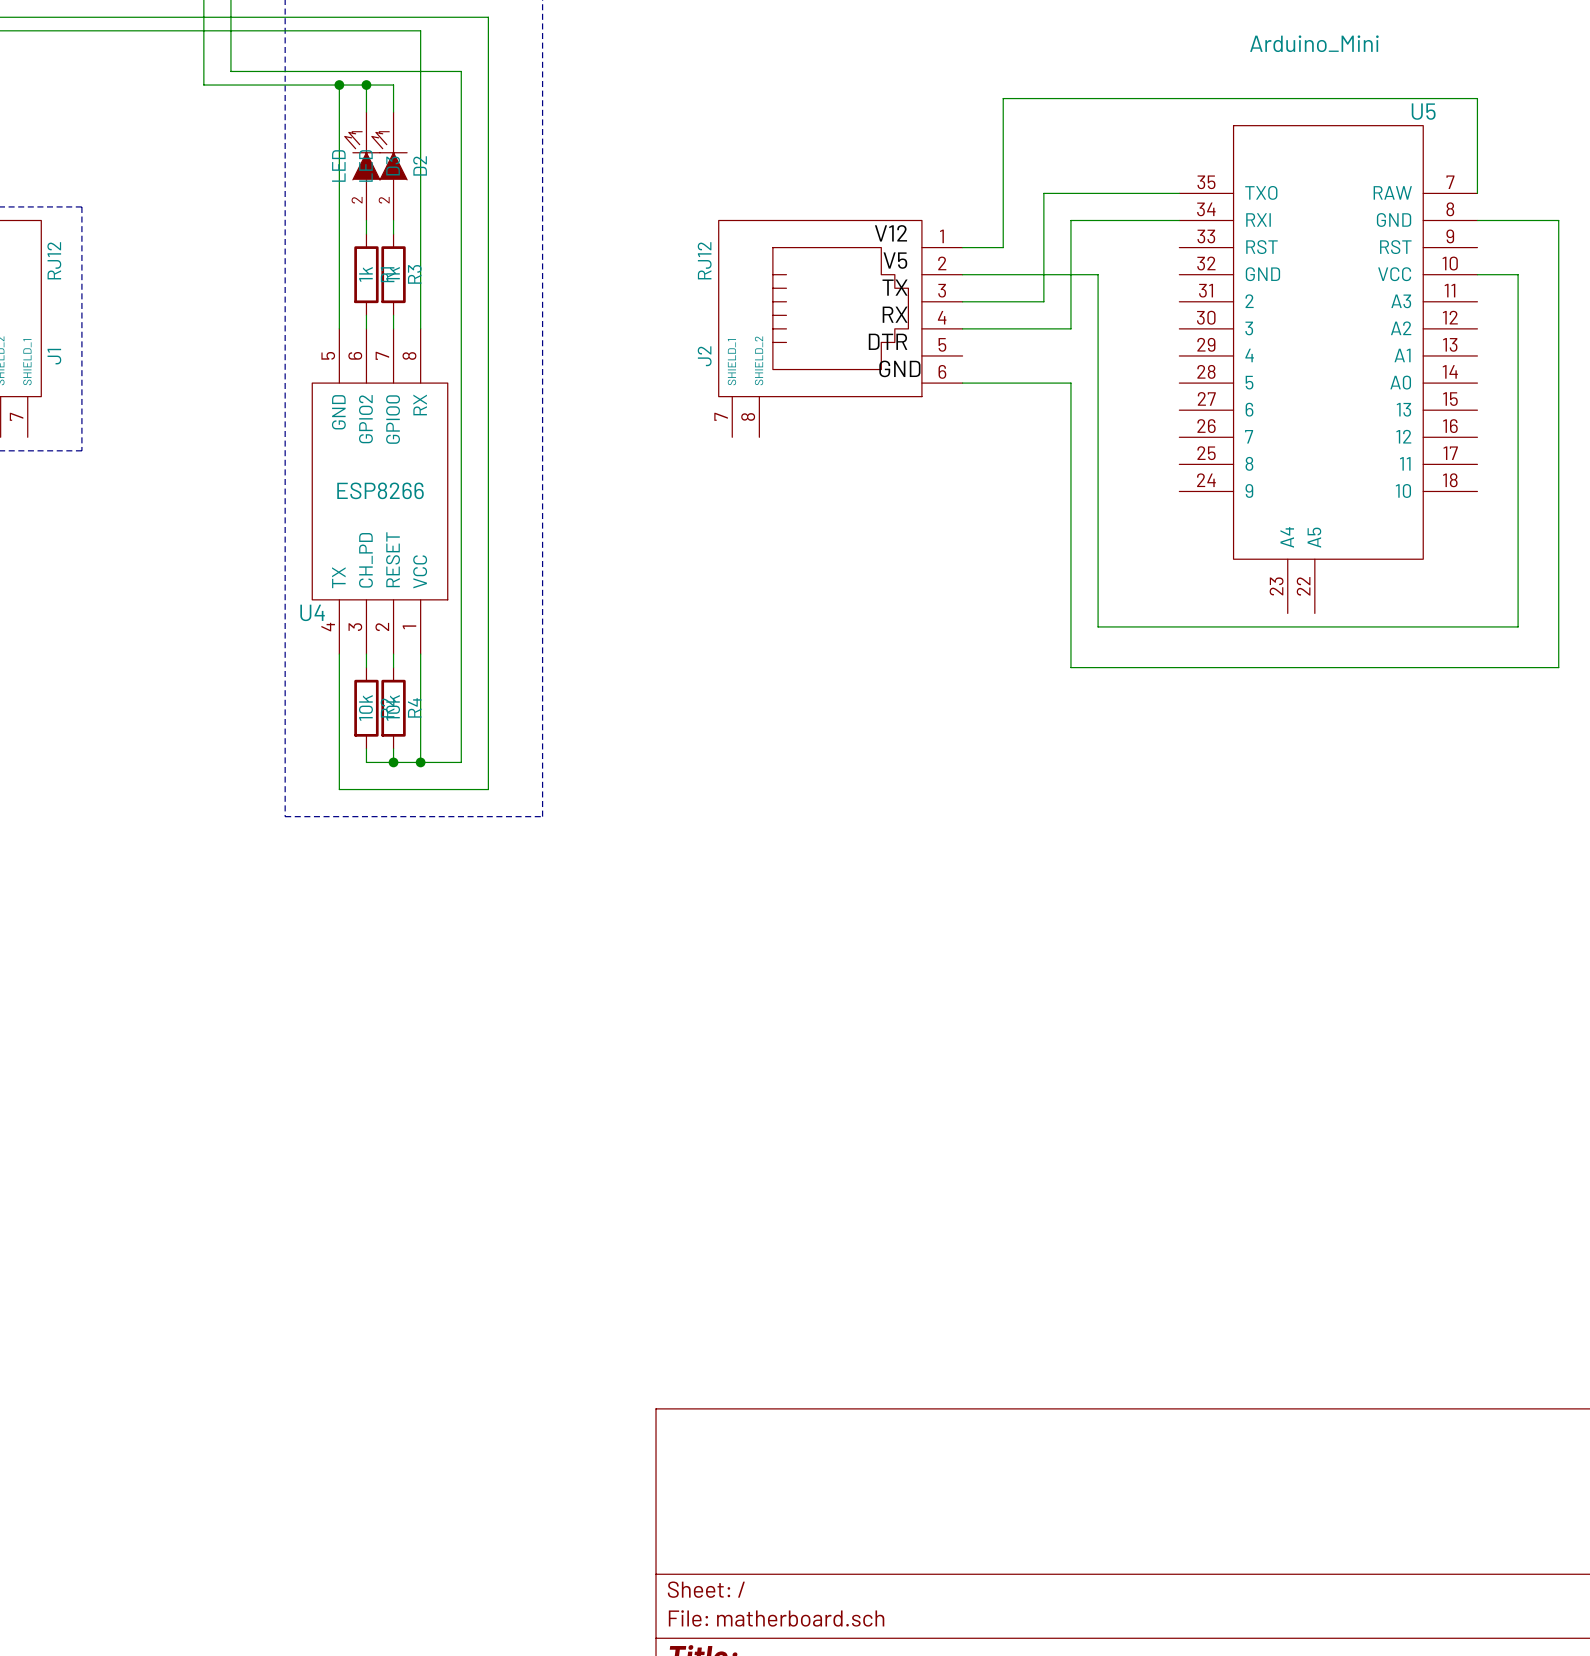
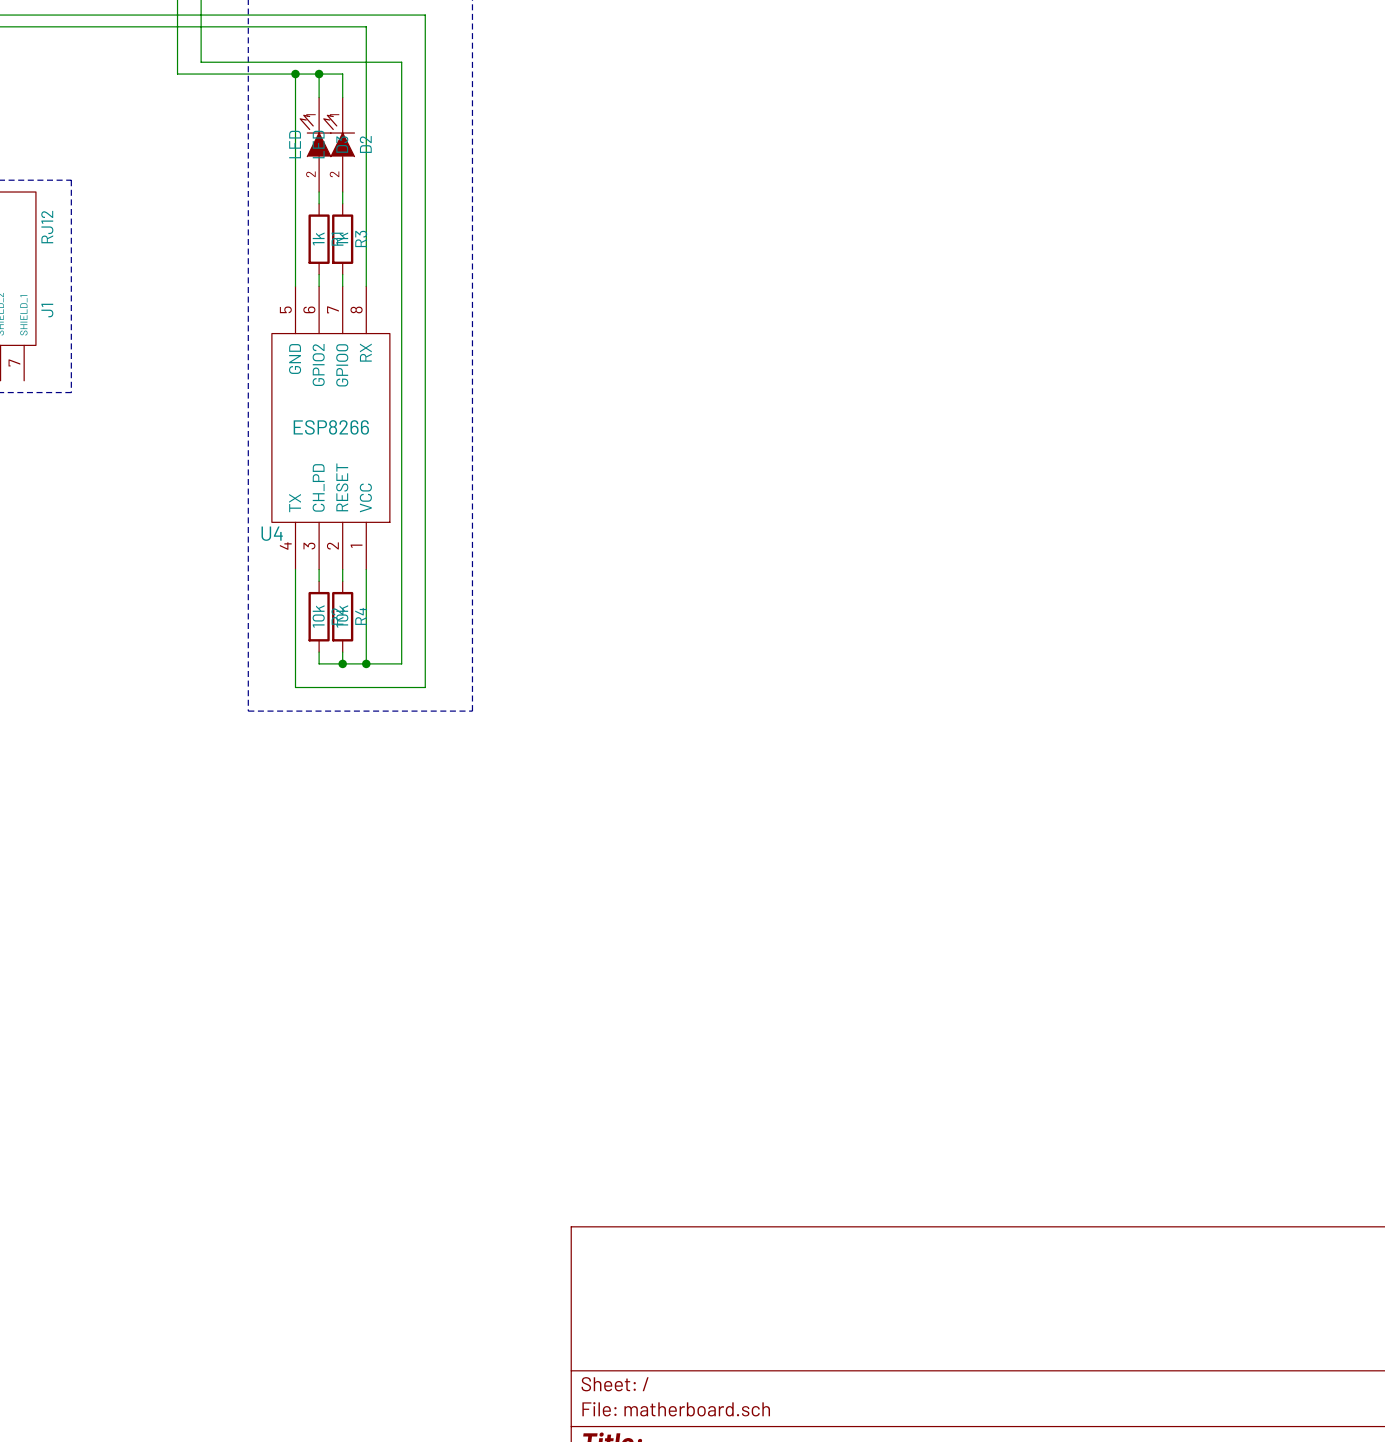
wire: (1179, 193) (1043, 193) (1043, 301) (962, 301) -> none
wire: (1477, 193) (1477, 98) (1003, 98) (1003, 247) (962, 247) -> none
wire: (1179, 220) (1070, 220) (1070, 328) (962, 328) -> none
wire: (1477, 220) (1558, 220) (1558, 667) (1070, 667) (1070, 383) (962, 383) -> none
label: V12 (890, 233) -> none
label: V5 (895, 260) -> none
wire: (962, 274) (1098, 274) (1098, 626) (1518, 626) (1518, 274) (1477, 274) -> none
label: TX (895, 287) -> none
label: RX (895, 314) -> none
J2: RJ12 (840, 328) -> none
label: DTR (888, 341) -> none
label: GND (899, 368) -> none
U5: Arduino_Mini (1308, 369) -> none

